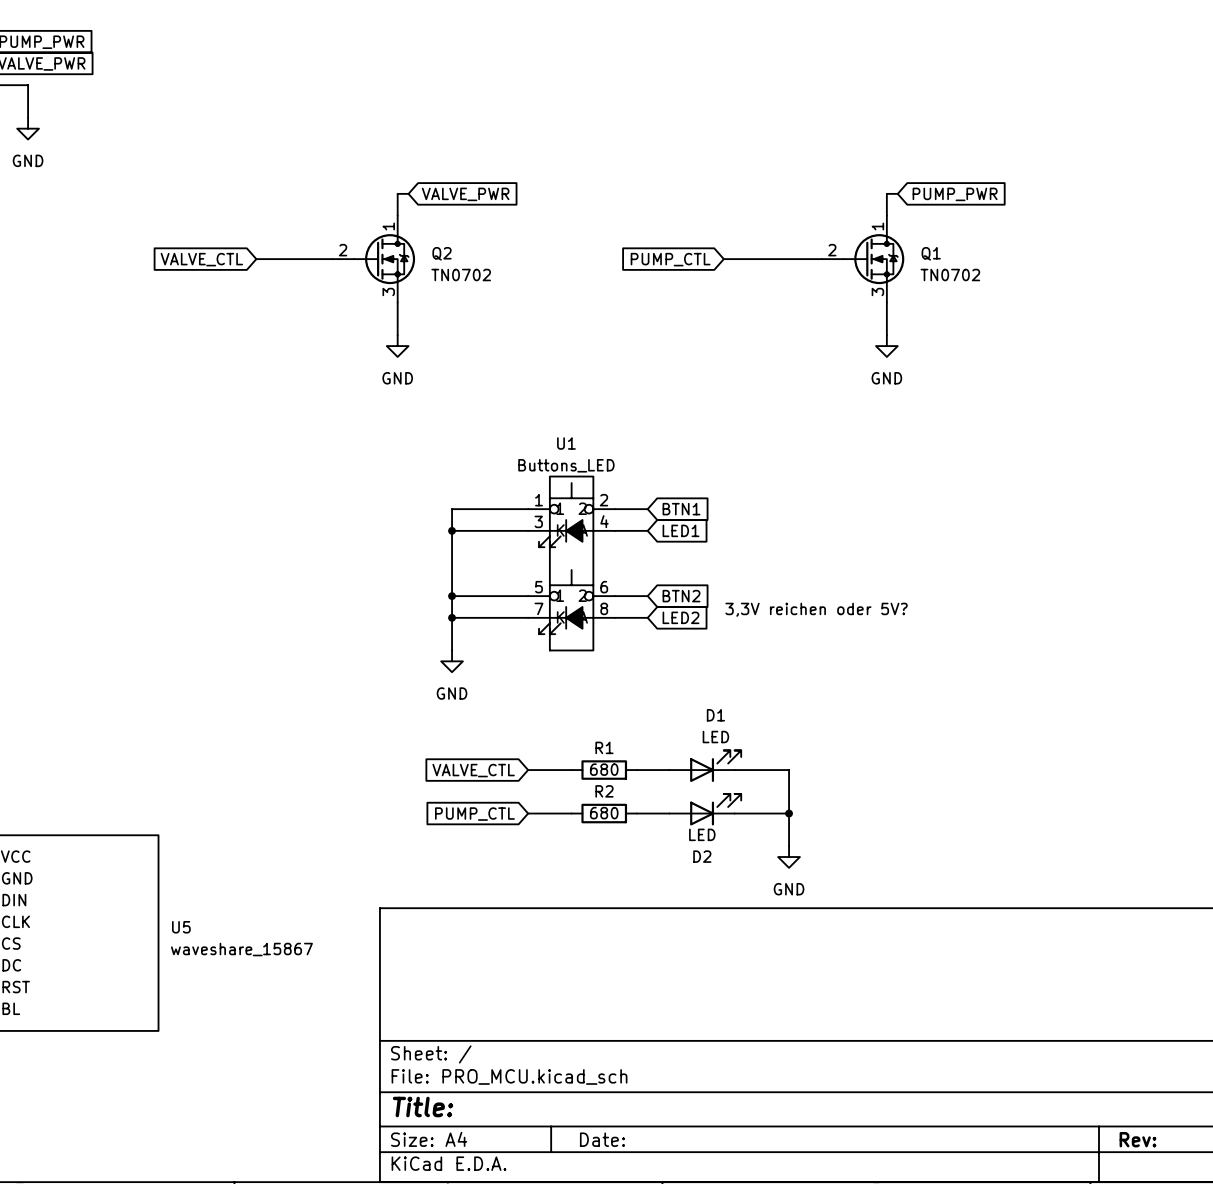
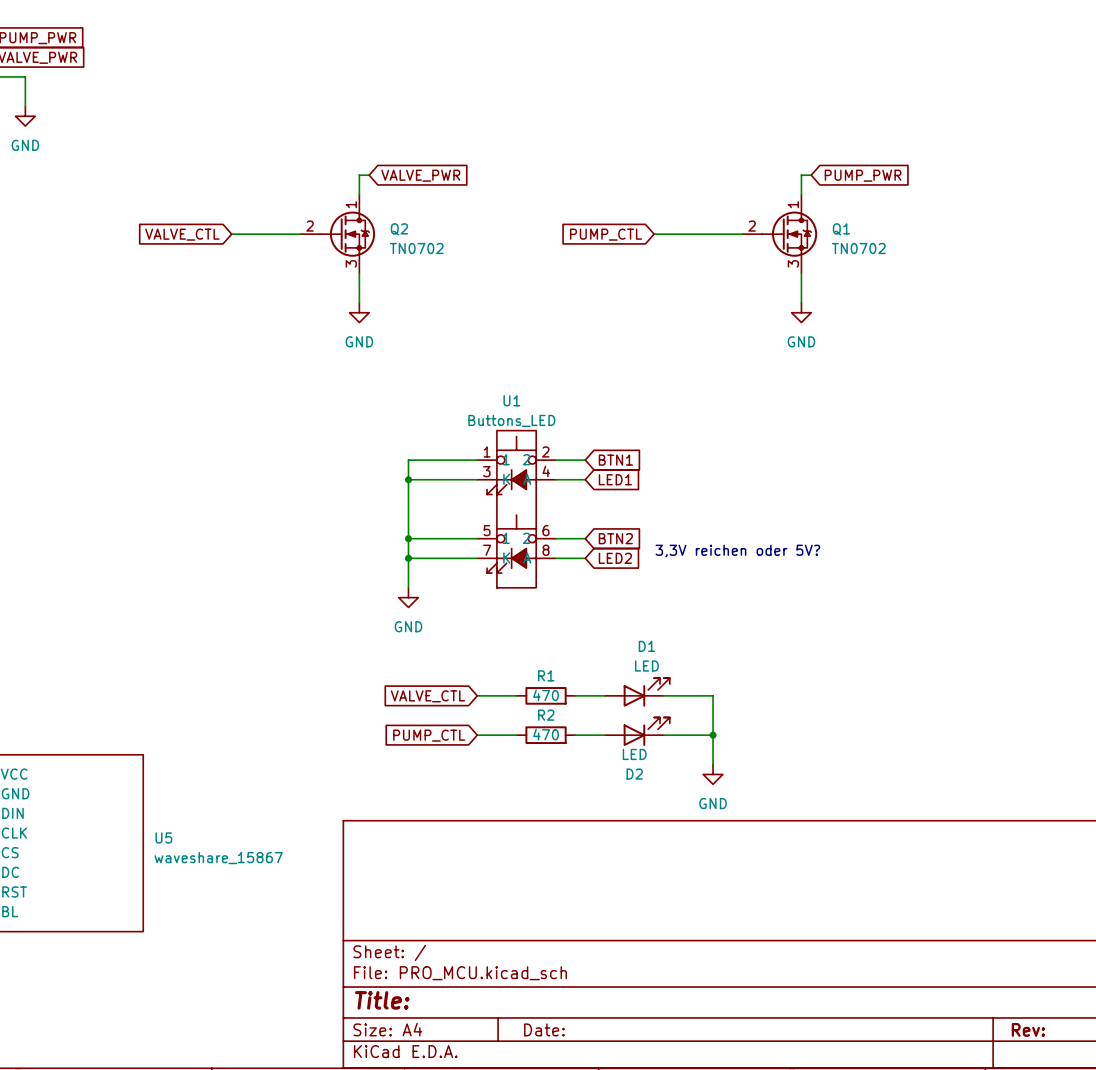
R1 value: 680 (604, 769) -> 470 (546, 695)
R2 value: 680 (604, 813) -> 470 (546, 734)

